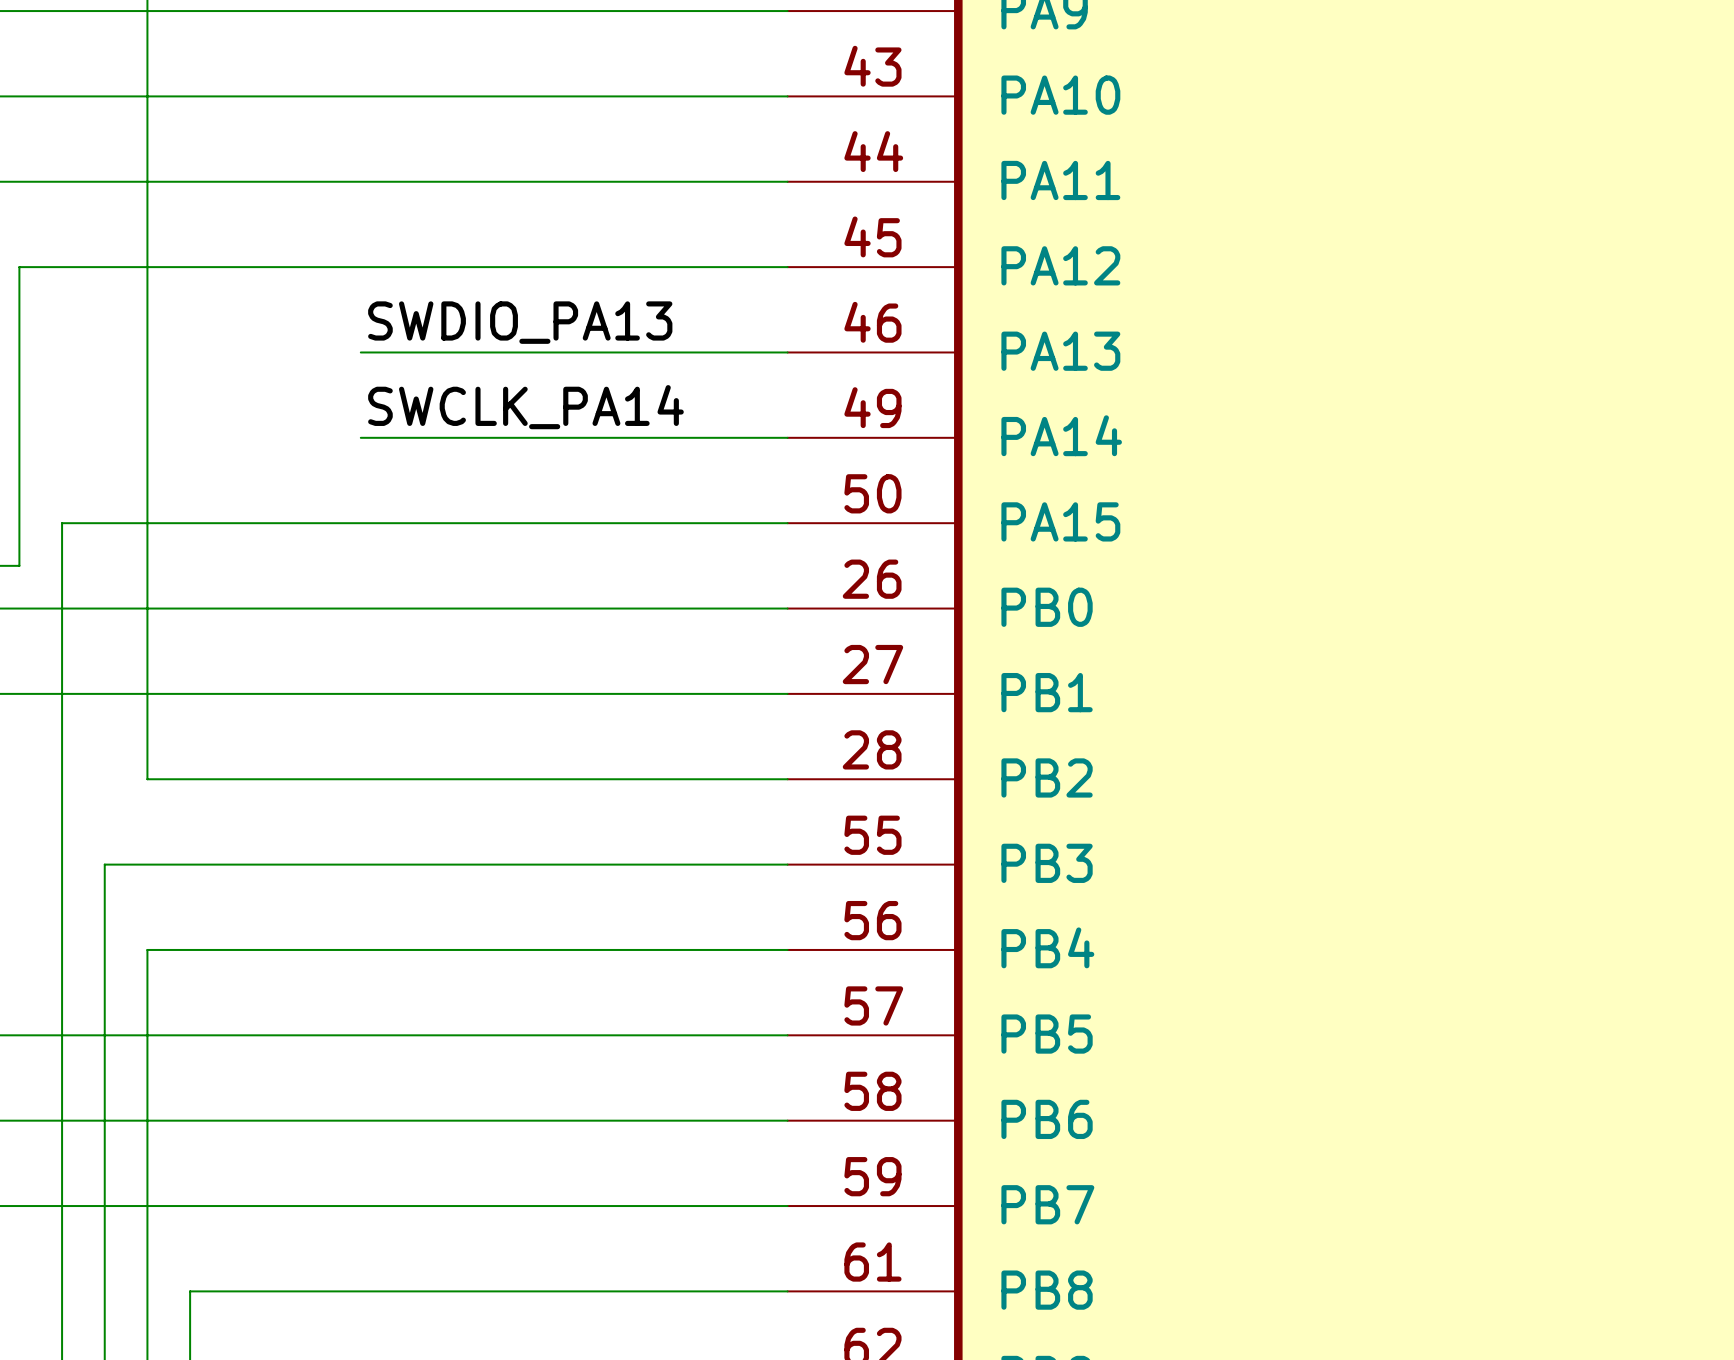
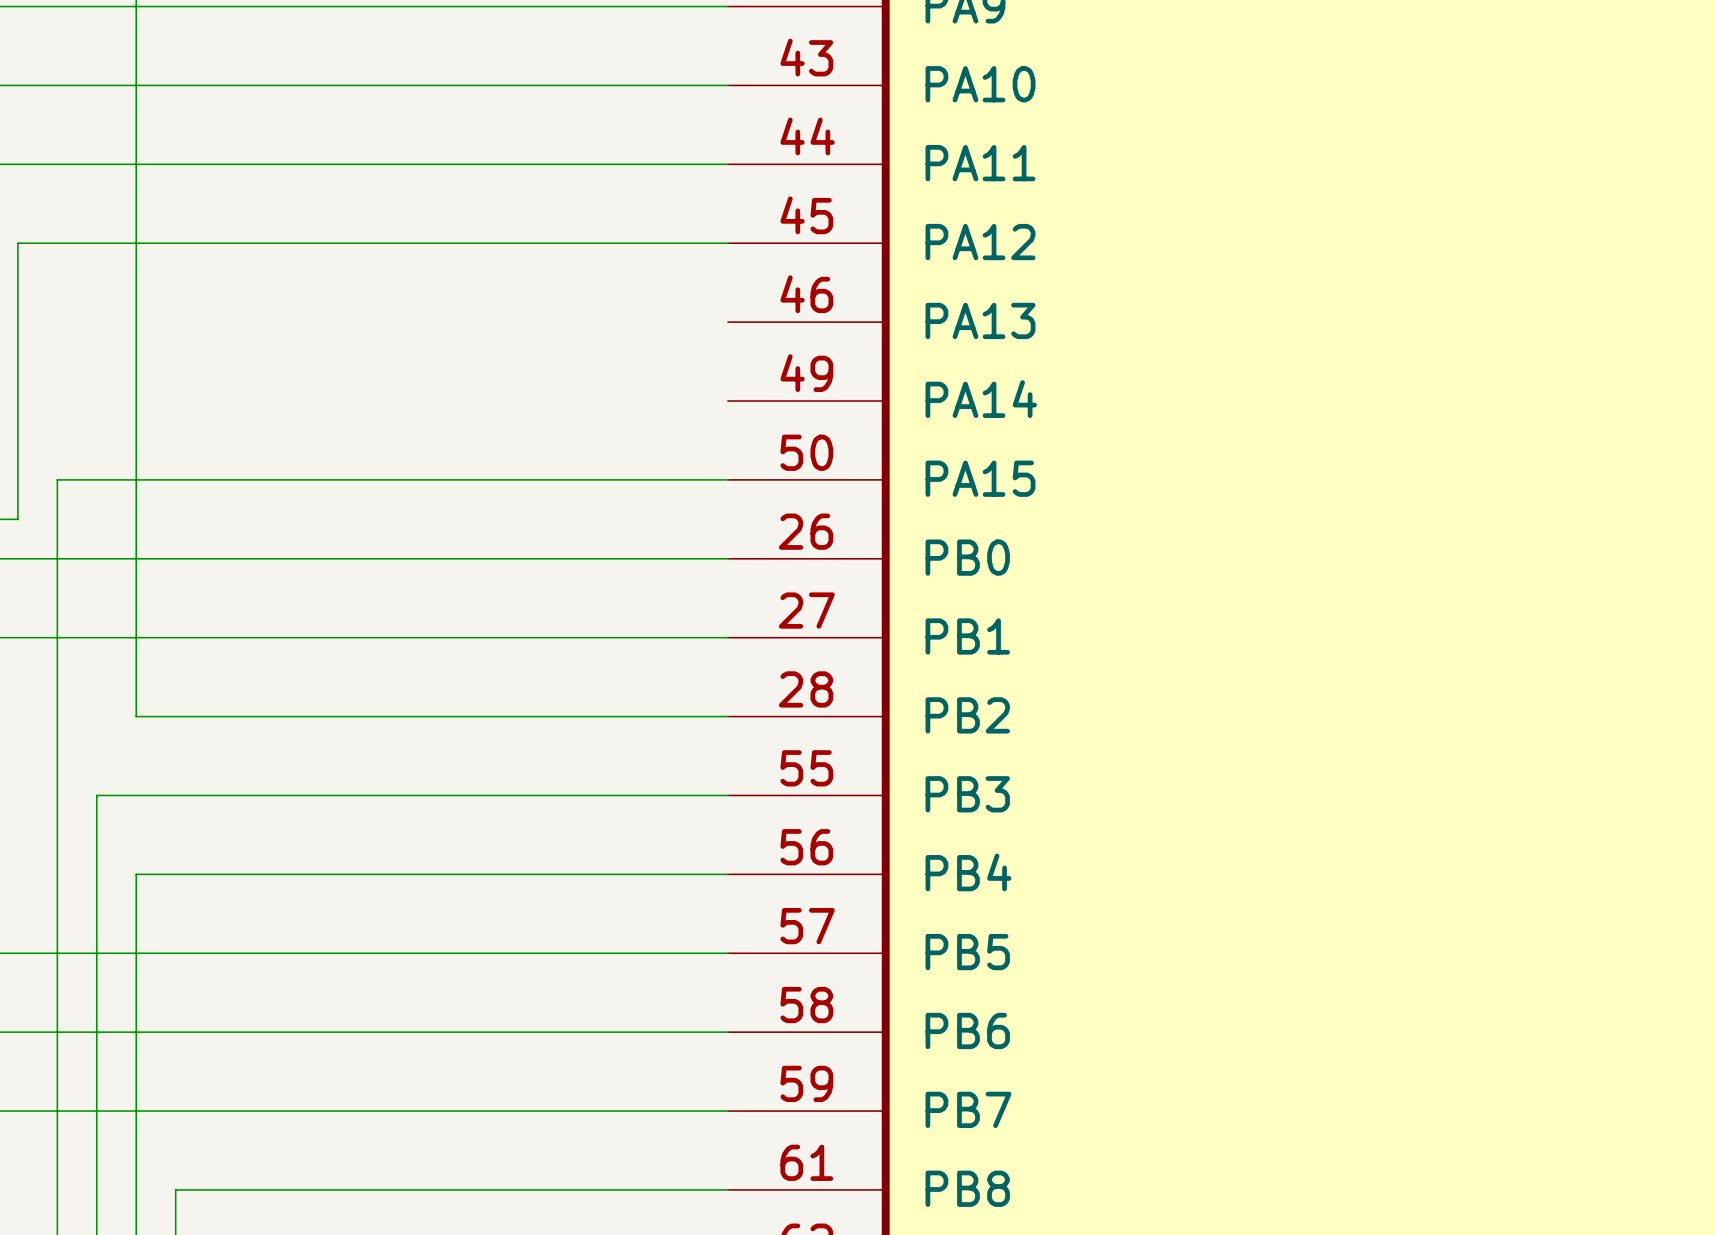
label: SWDIO_PA13 (520, 322) -> none
wire: (360, 352) (787, 352) -> none
label: SWCLK_PA14 (525, 407) -> none
wire: (360, 437) (787, 437) -> none

